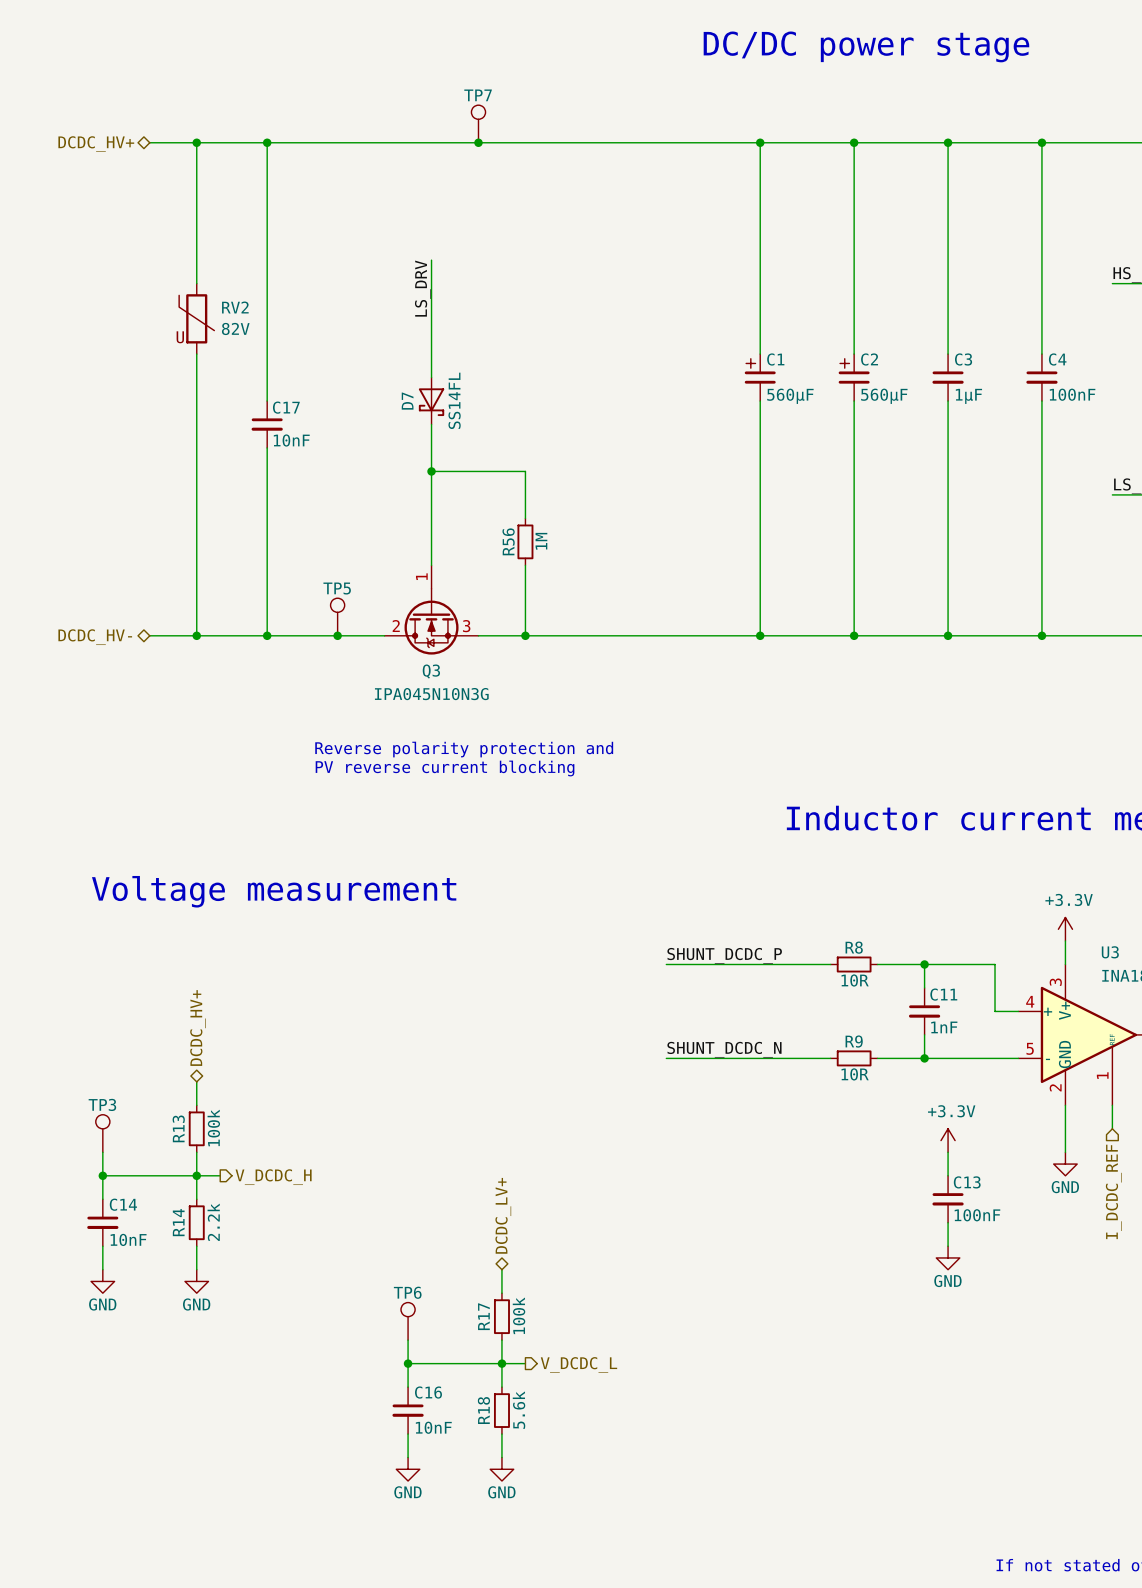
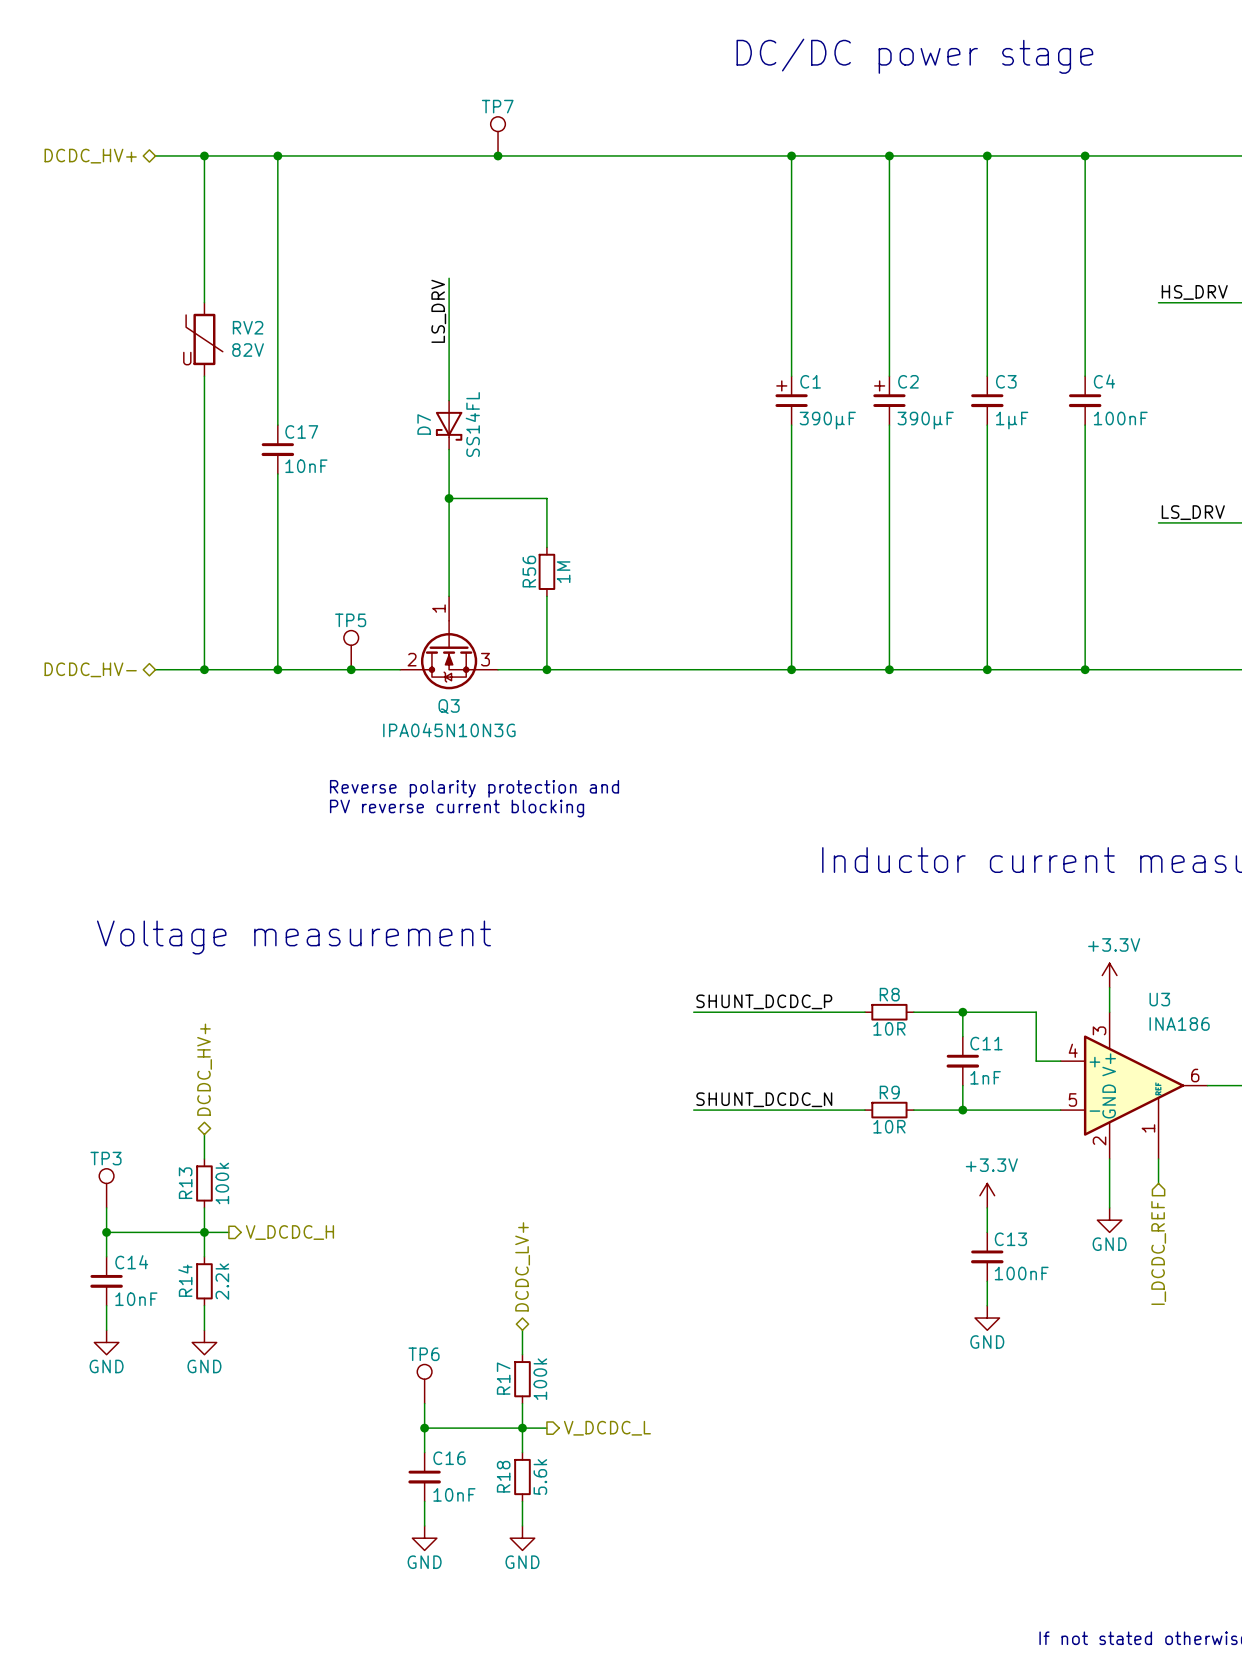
C1 value: 560µF (790, 396) -> 390µF (827, 420)
C2 value: 560µF (884, 396) -> 390µF (925, 420)

